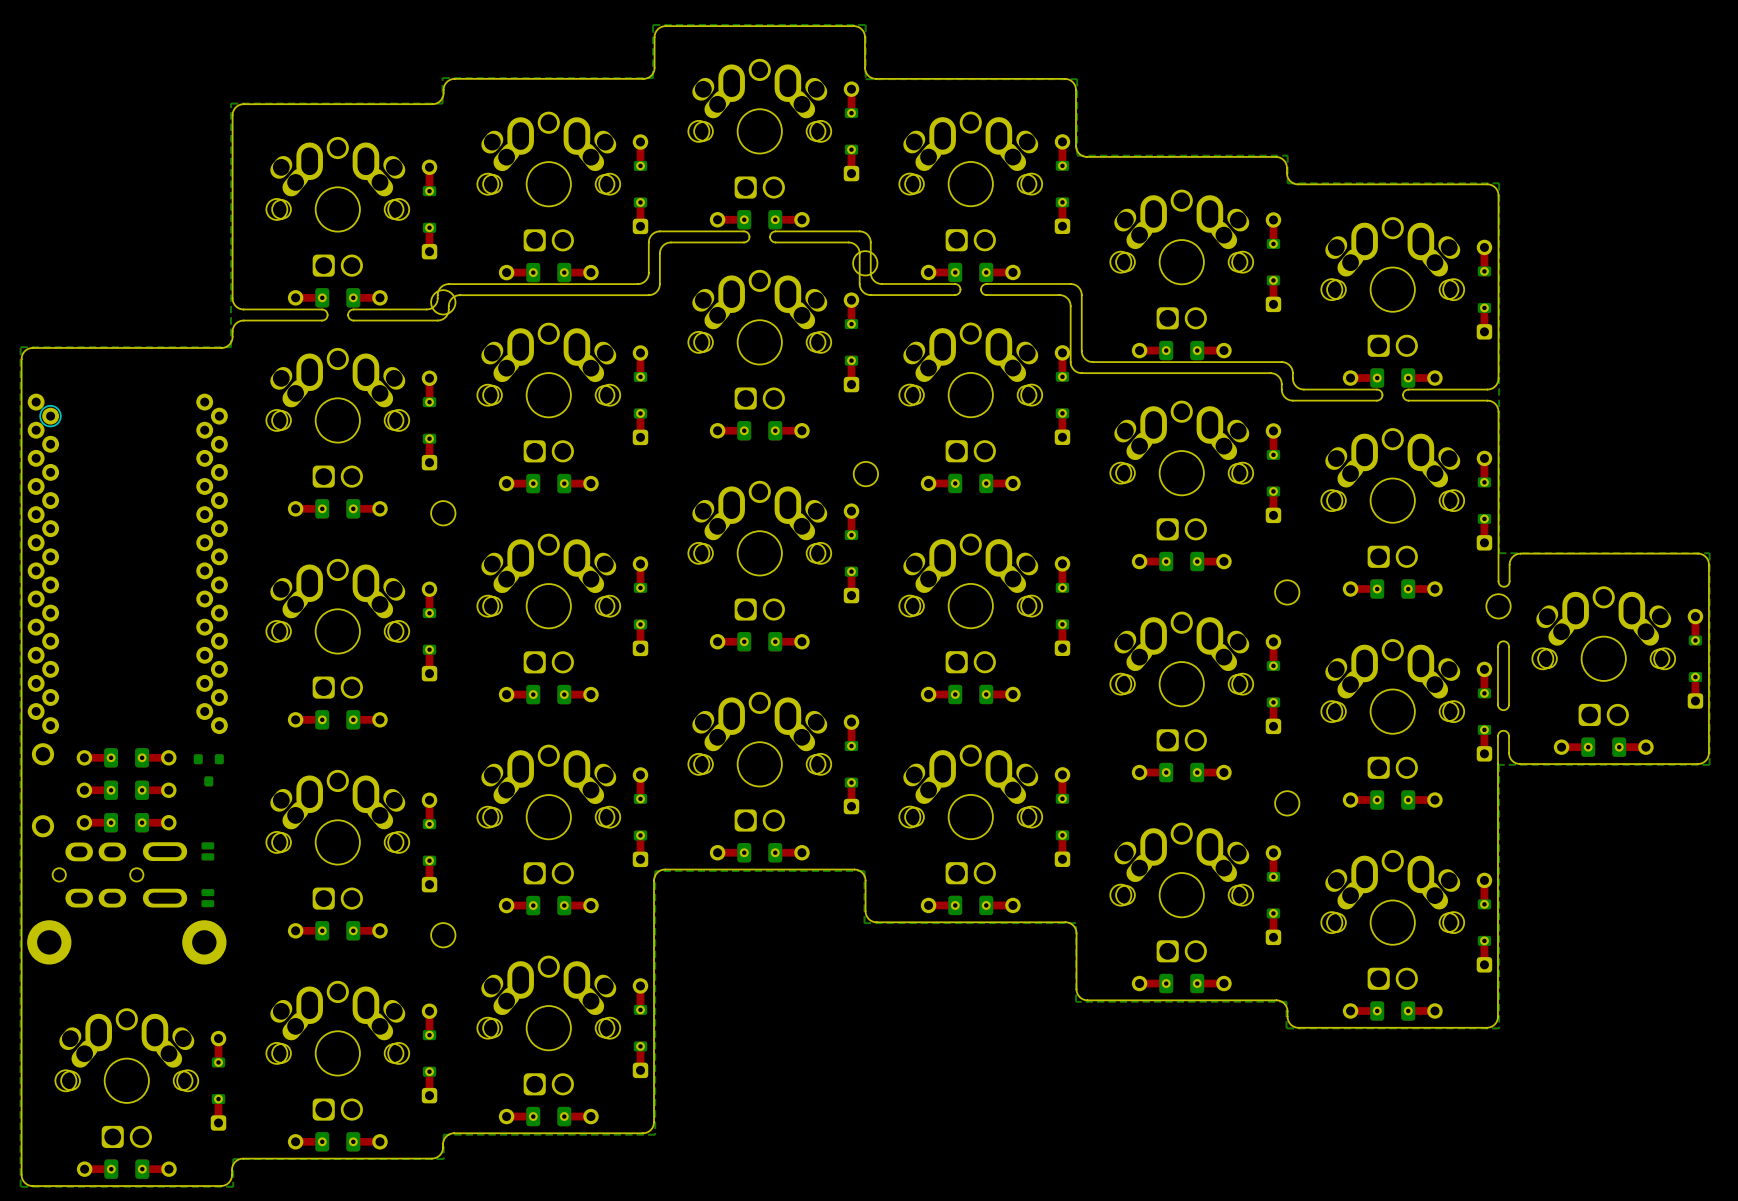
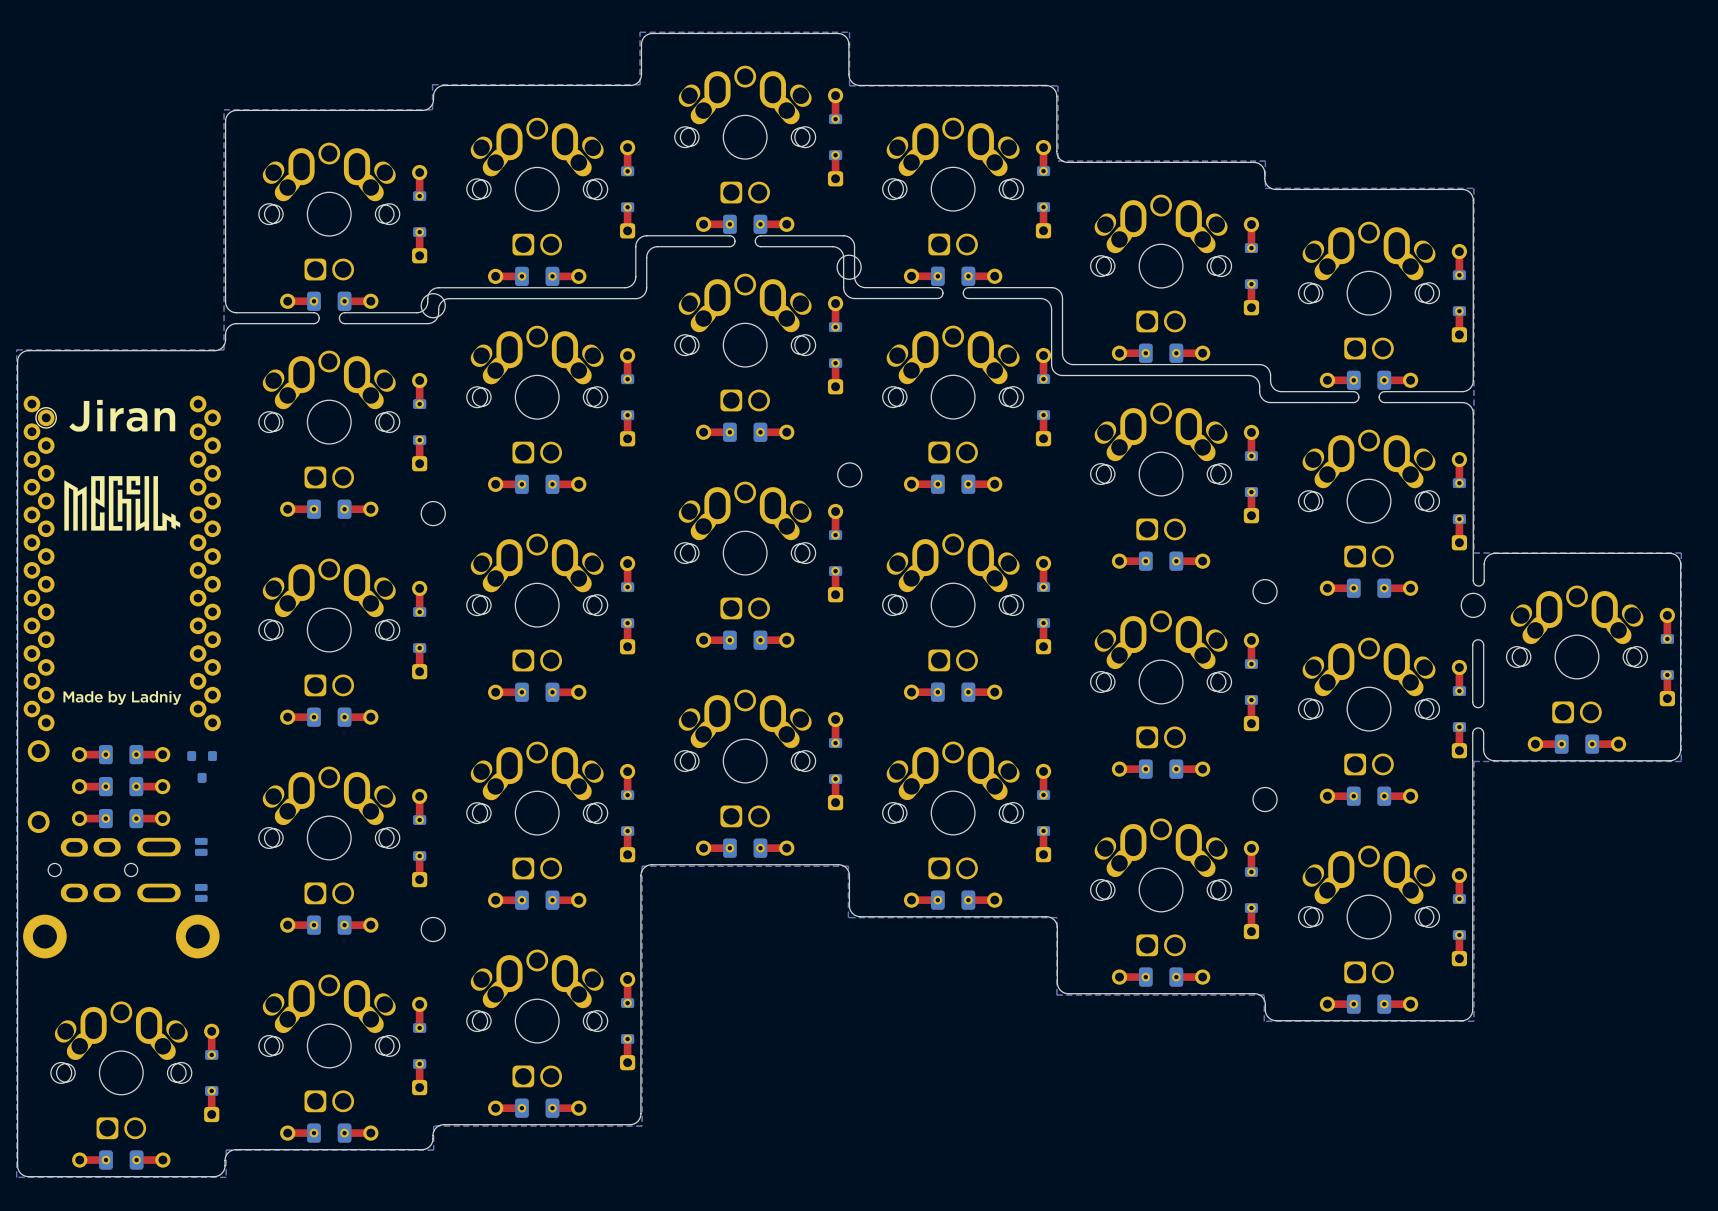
drawing: none -> [63, 399, 182, 705]

